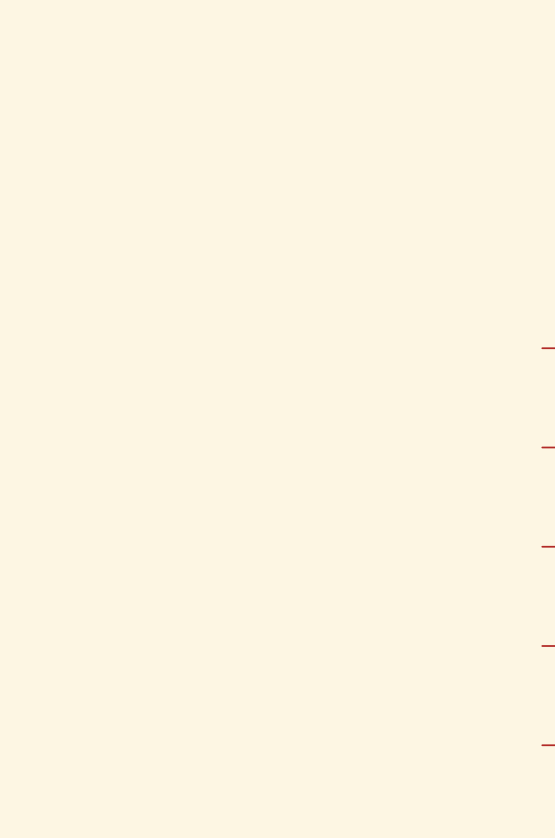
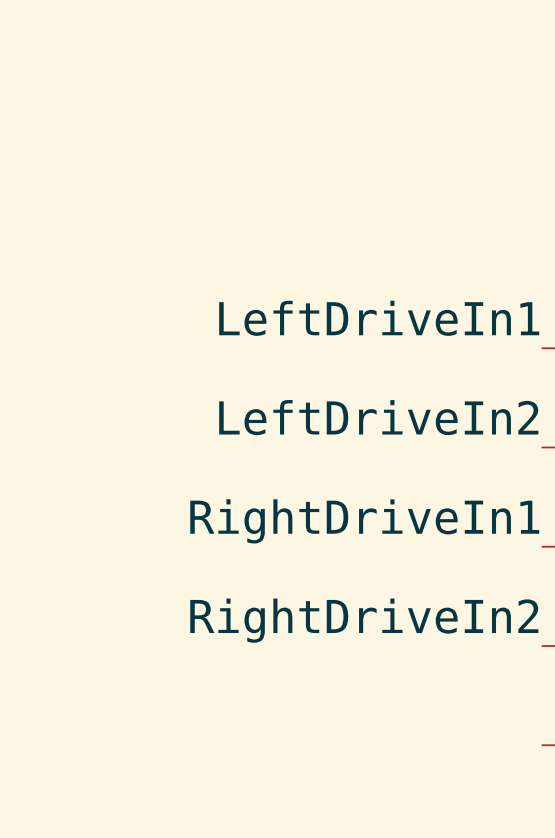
label: none -> LeftDriveIn1 (379, 318)
label: none -> LeftDriveIn2 (378, 417)
label: none -> RightDriveIn1 (364, 521)
label: none -> RightDriveIn2 (364, 620)

